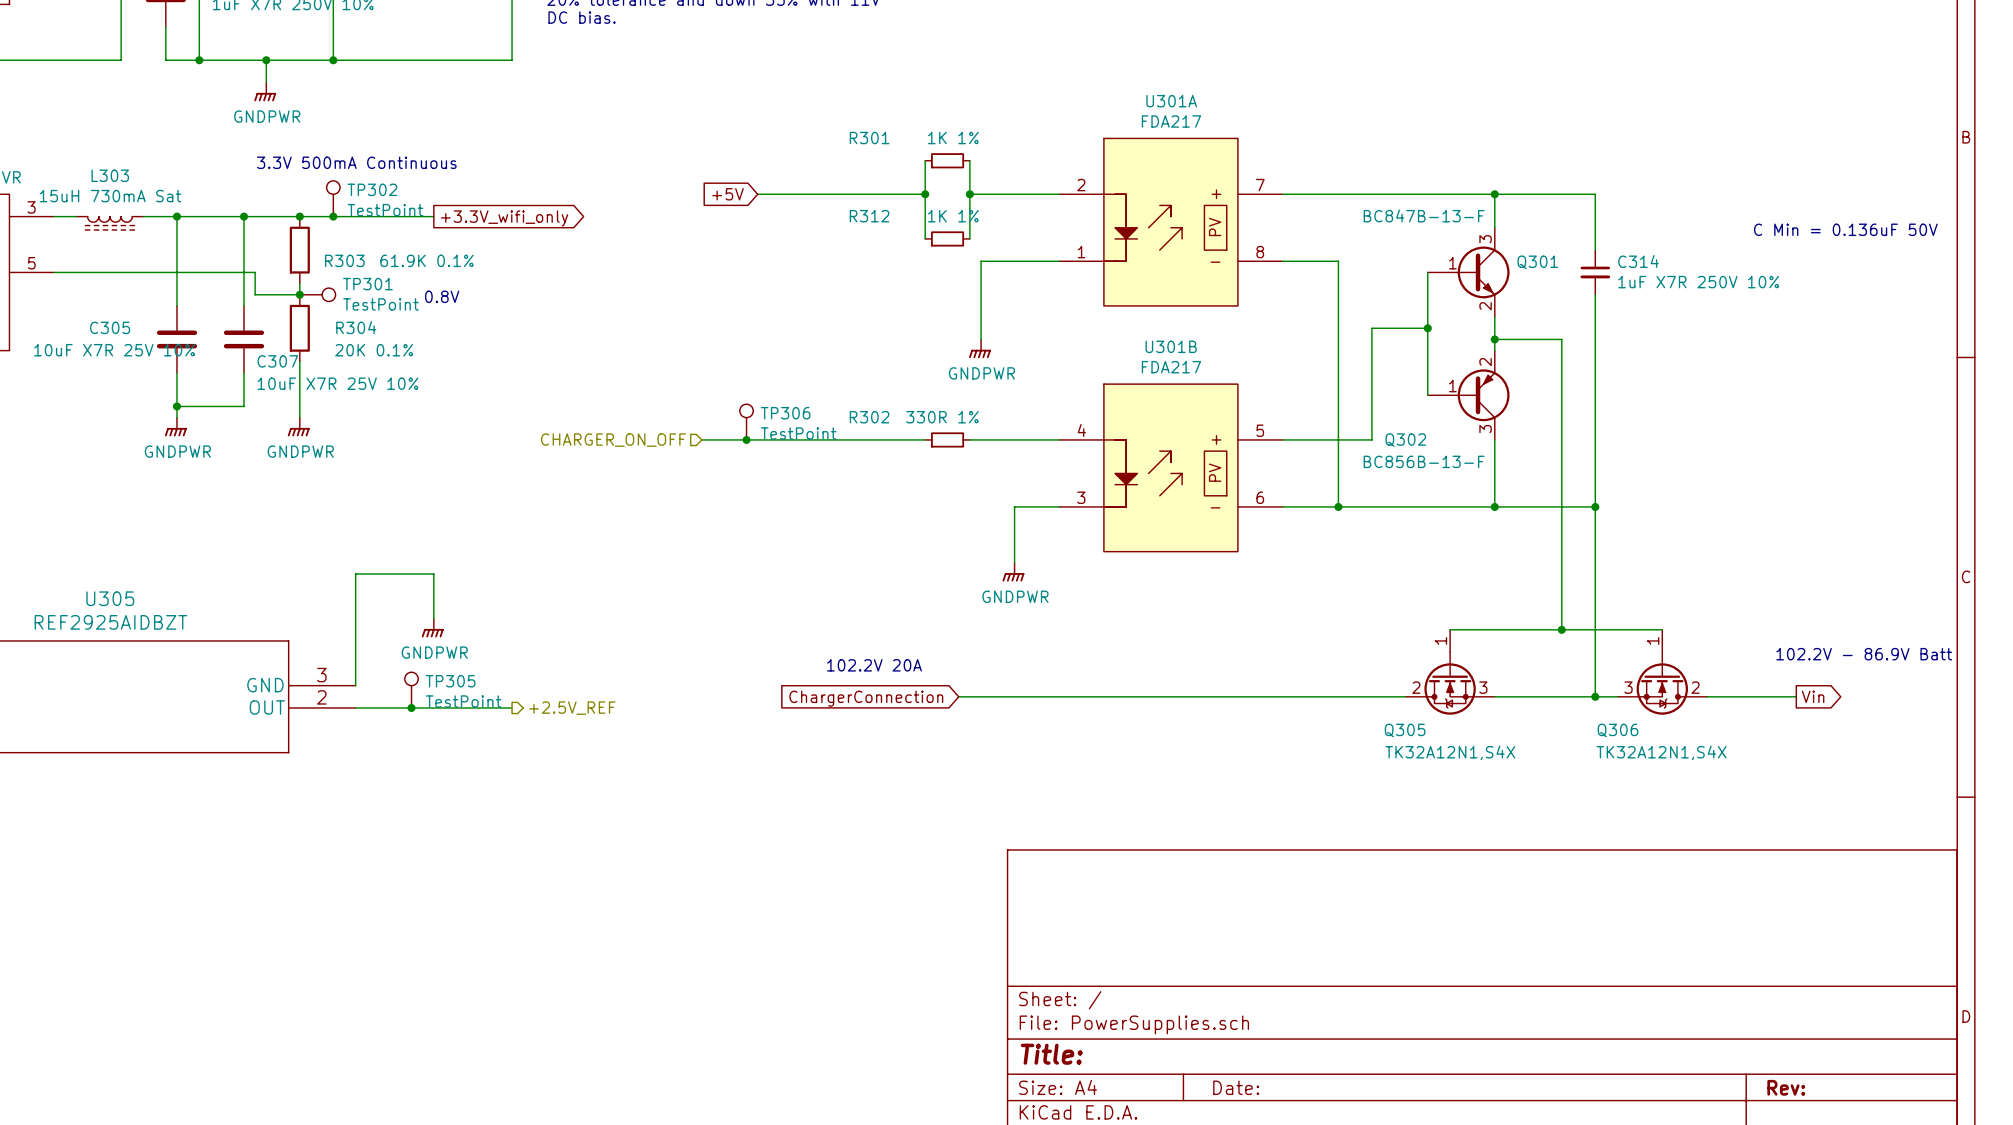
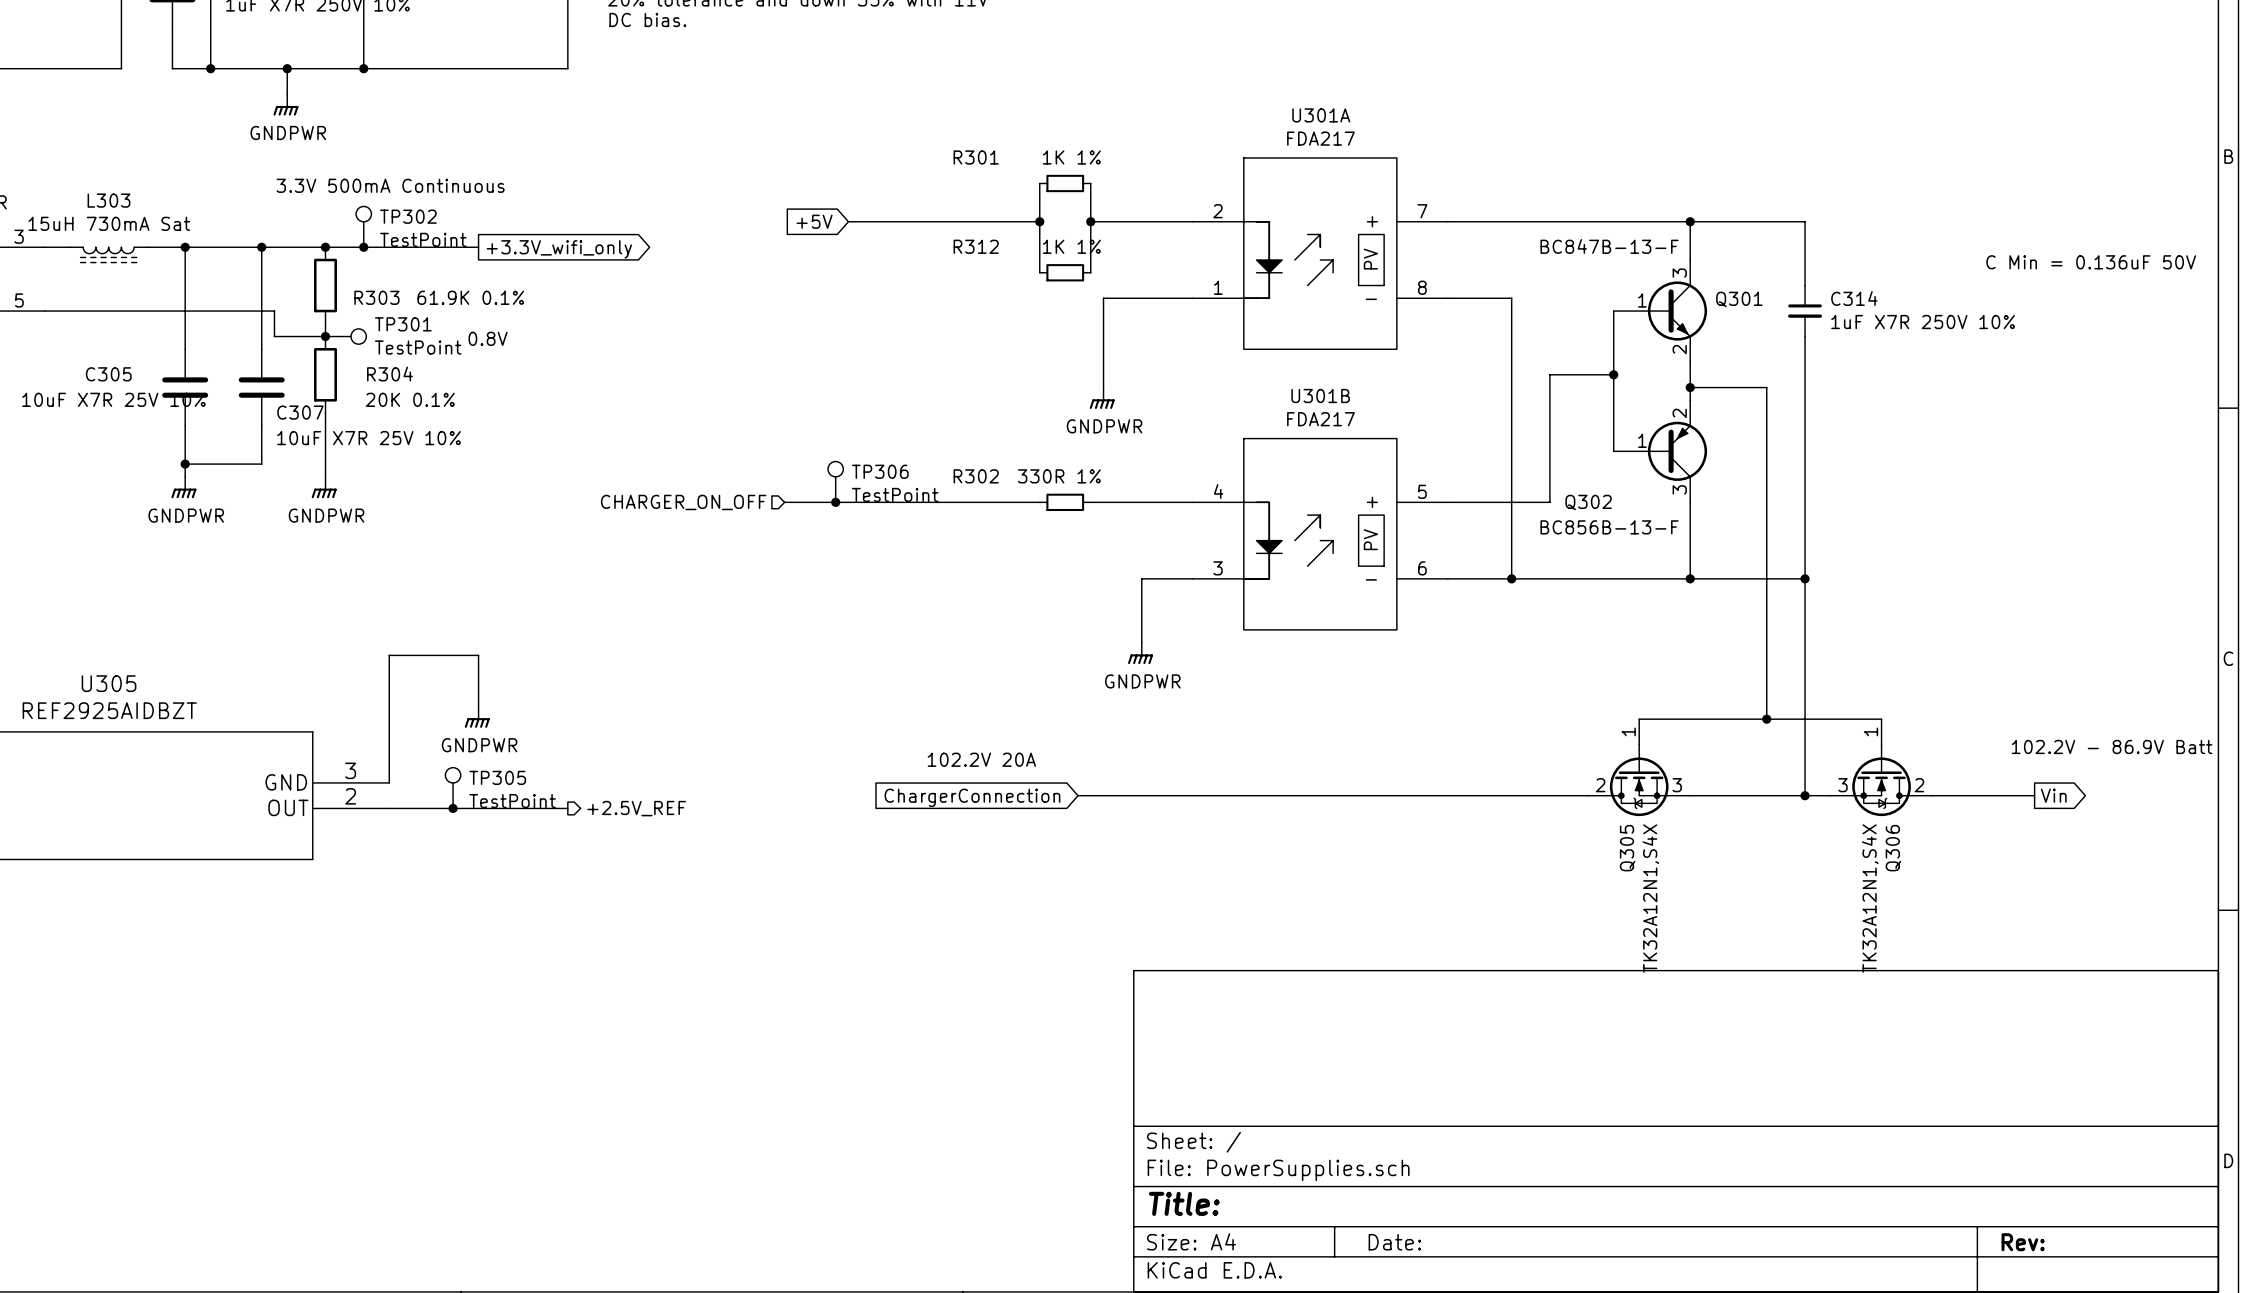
Q305 name rotation: 0° (1405, 730) -> 90° counterclockwise (1627, 848)
Q306 name rotation: 0° (1617, 730) -> 90° counterclockwise (1893, 848)
Q306 name position: Q306 (1617, 730) -> Q306 (1893, 848)
Q305 value rotation: 0° (1450, 752) -> 90° counterclockwise (1650, 898)
Q306 value rotation: 0° (1661, 752) -> 90° counterclockwise (1870, 898)

